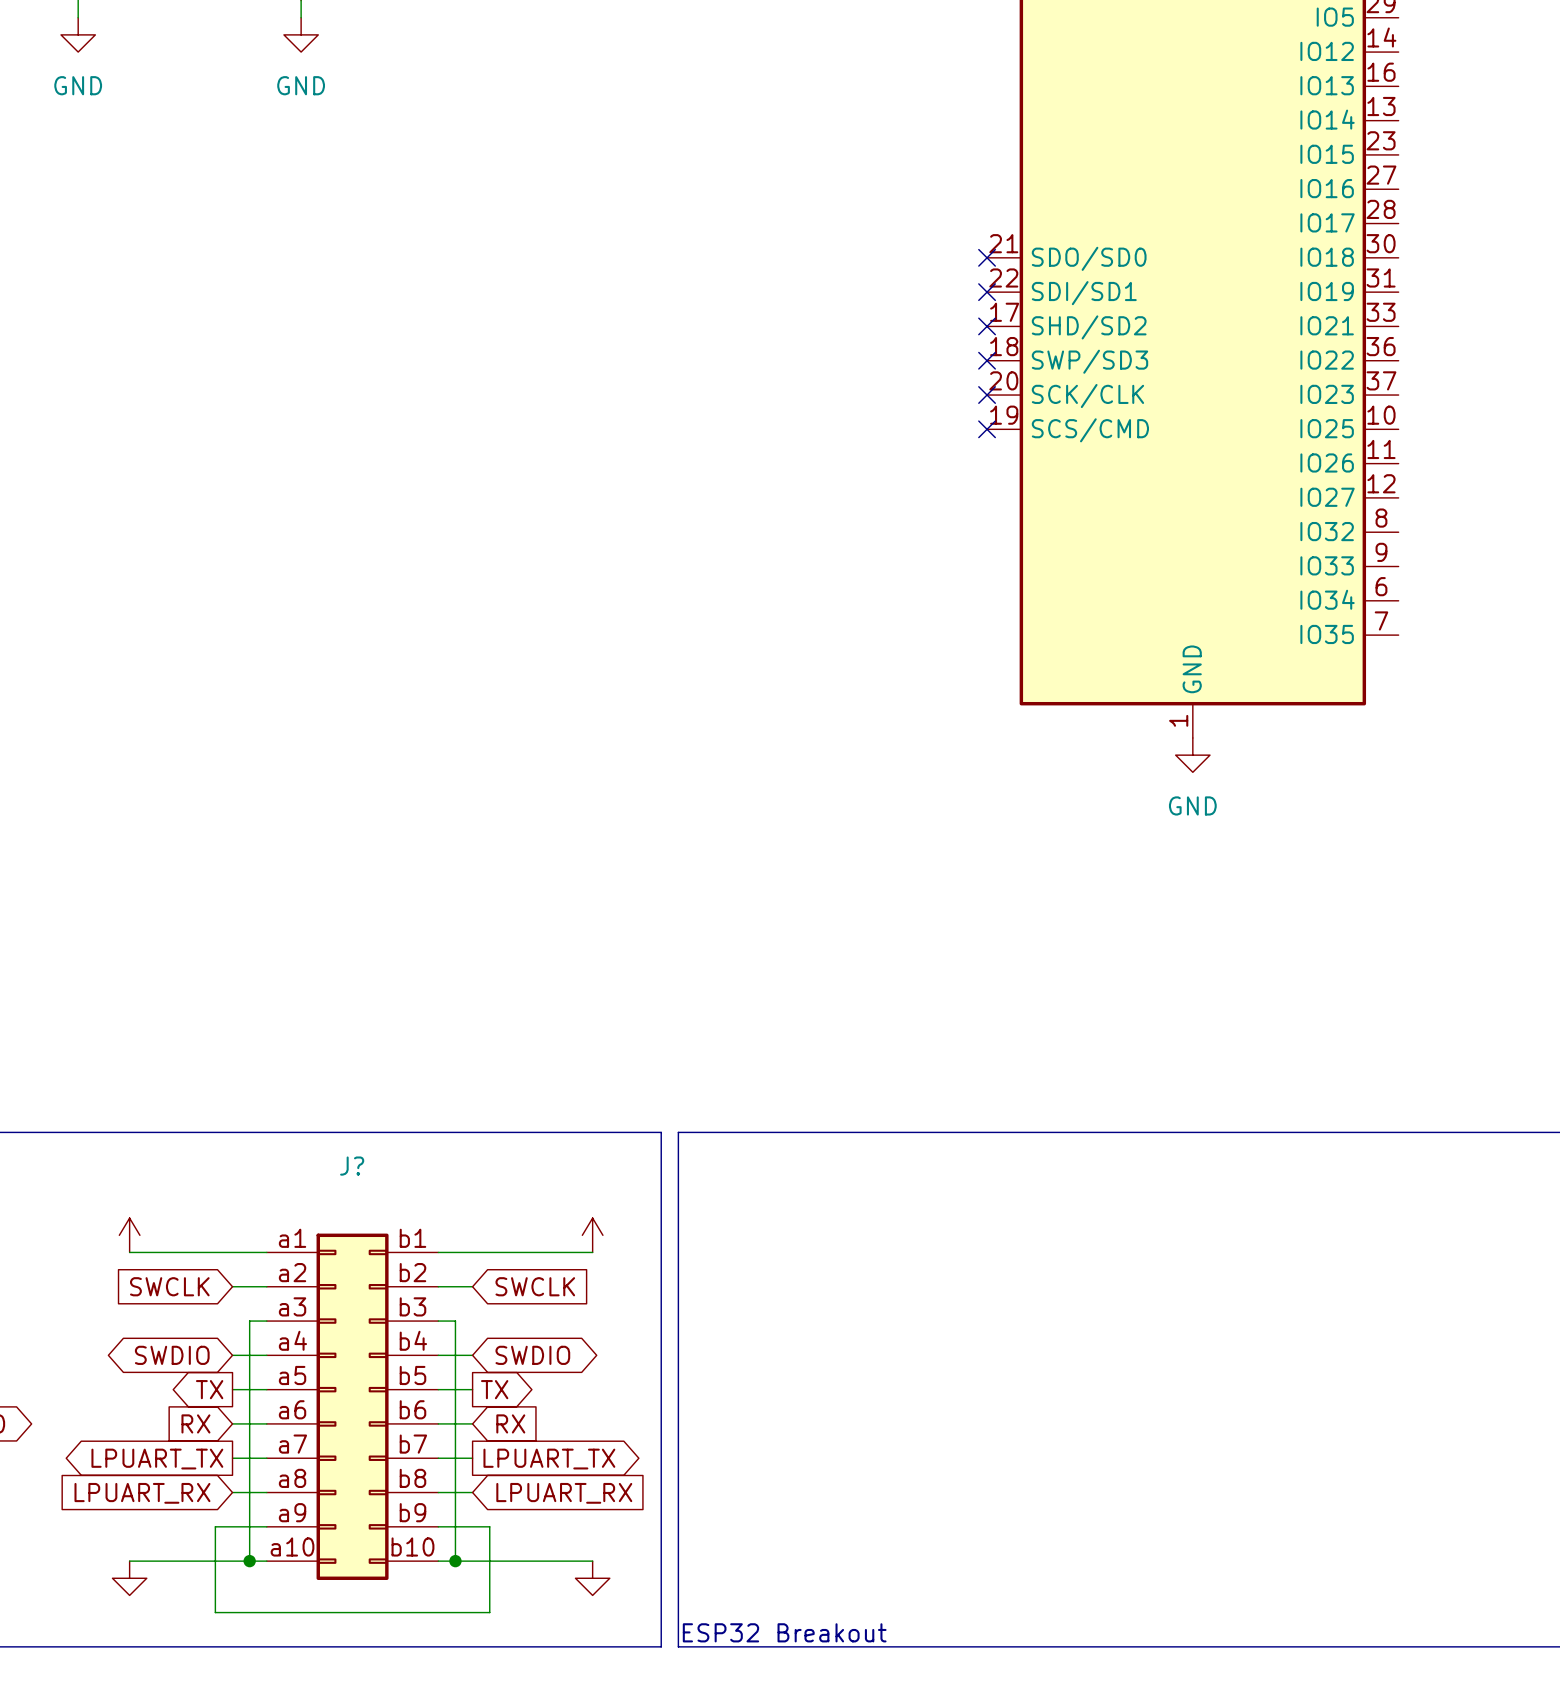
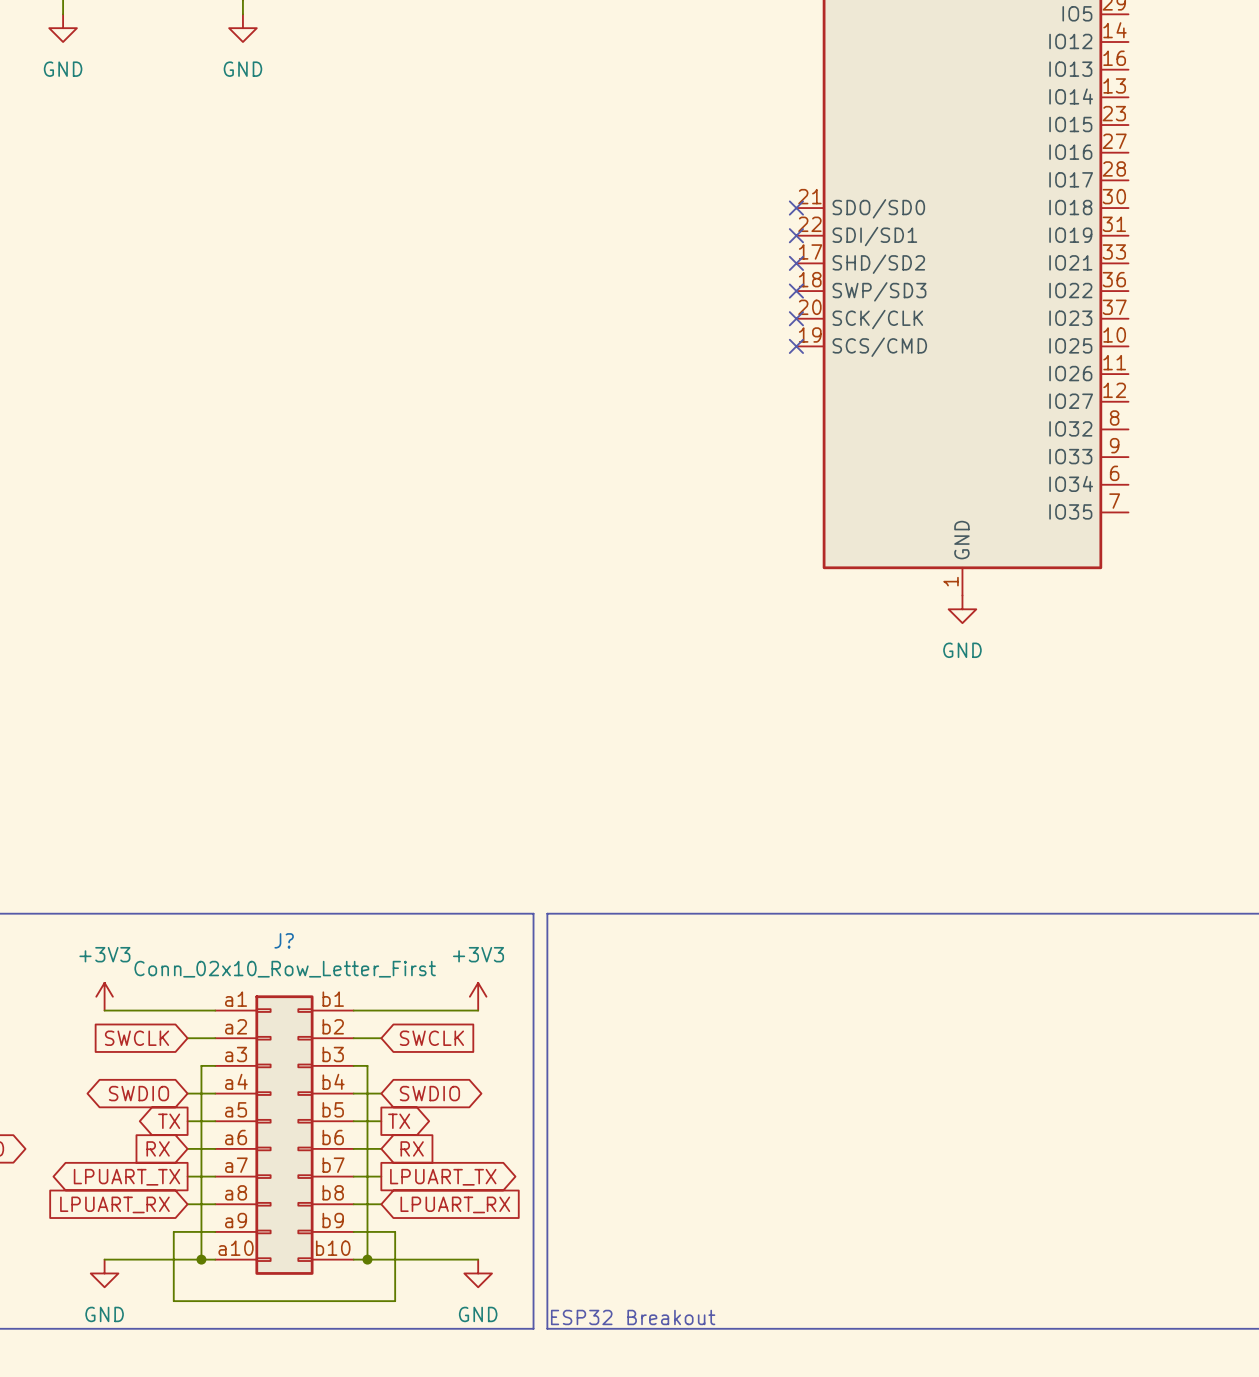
power symbol text: none -> +3V3 (104, 954)
power symbol text: none -> +3V3 (478, 954)
J? value: none -> Conn_02x10_Row_Letter_First (285, 969)
power symbol text: none -> GND (104, 1314)
power symbol text: none -> GND (478, 1314)

